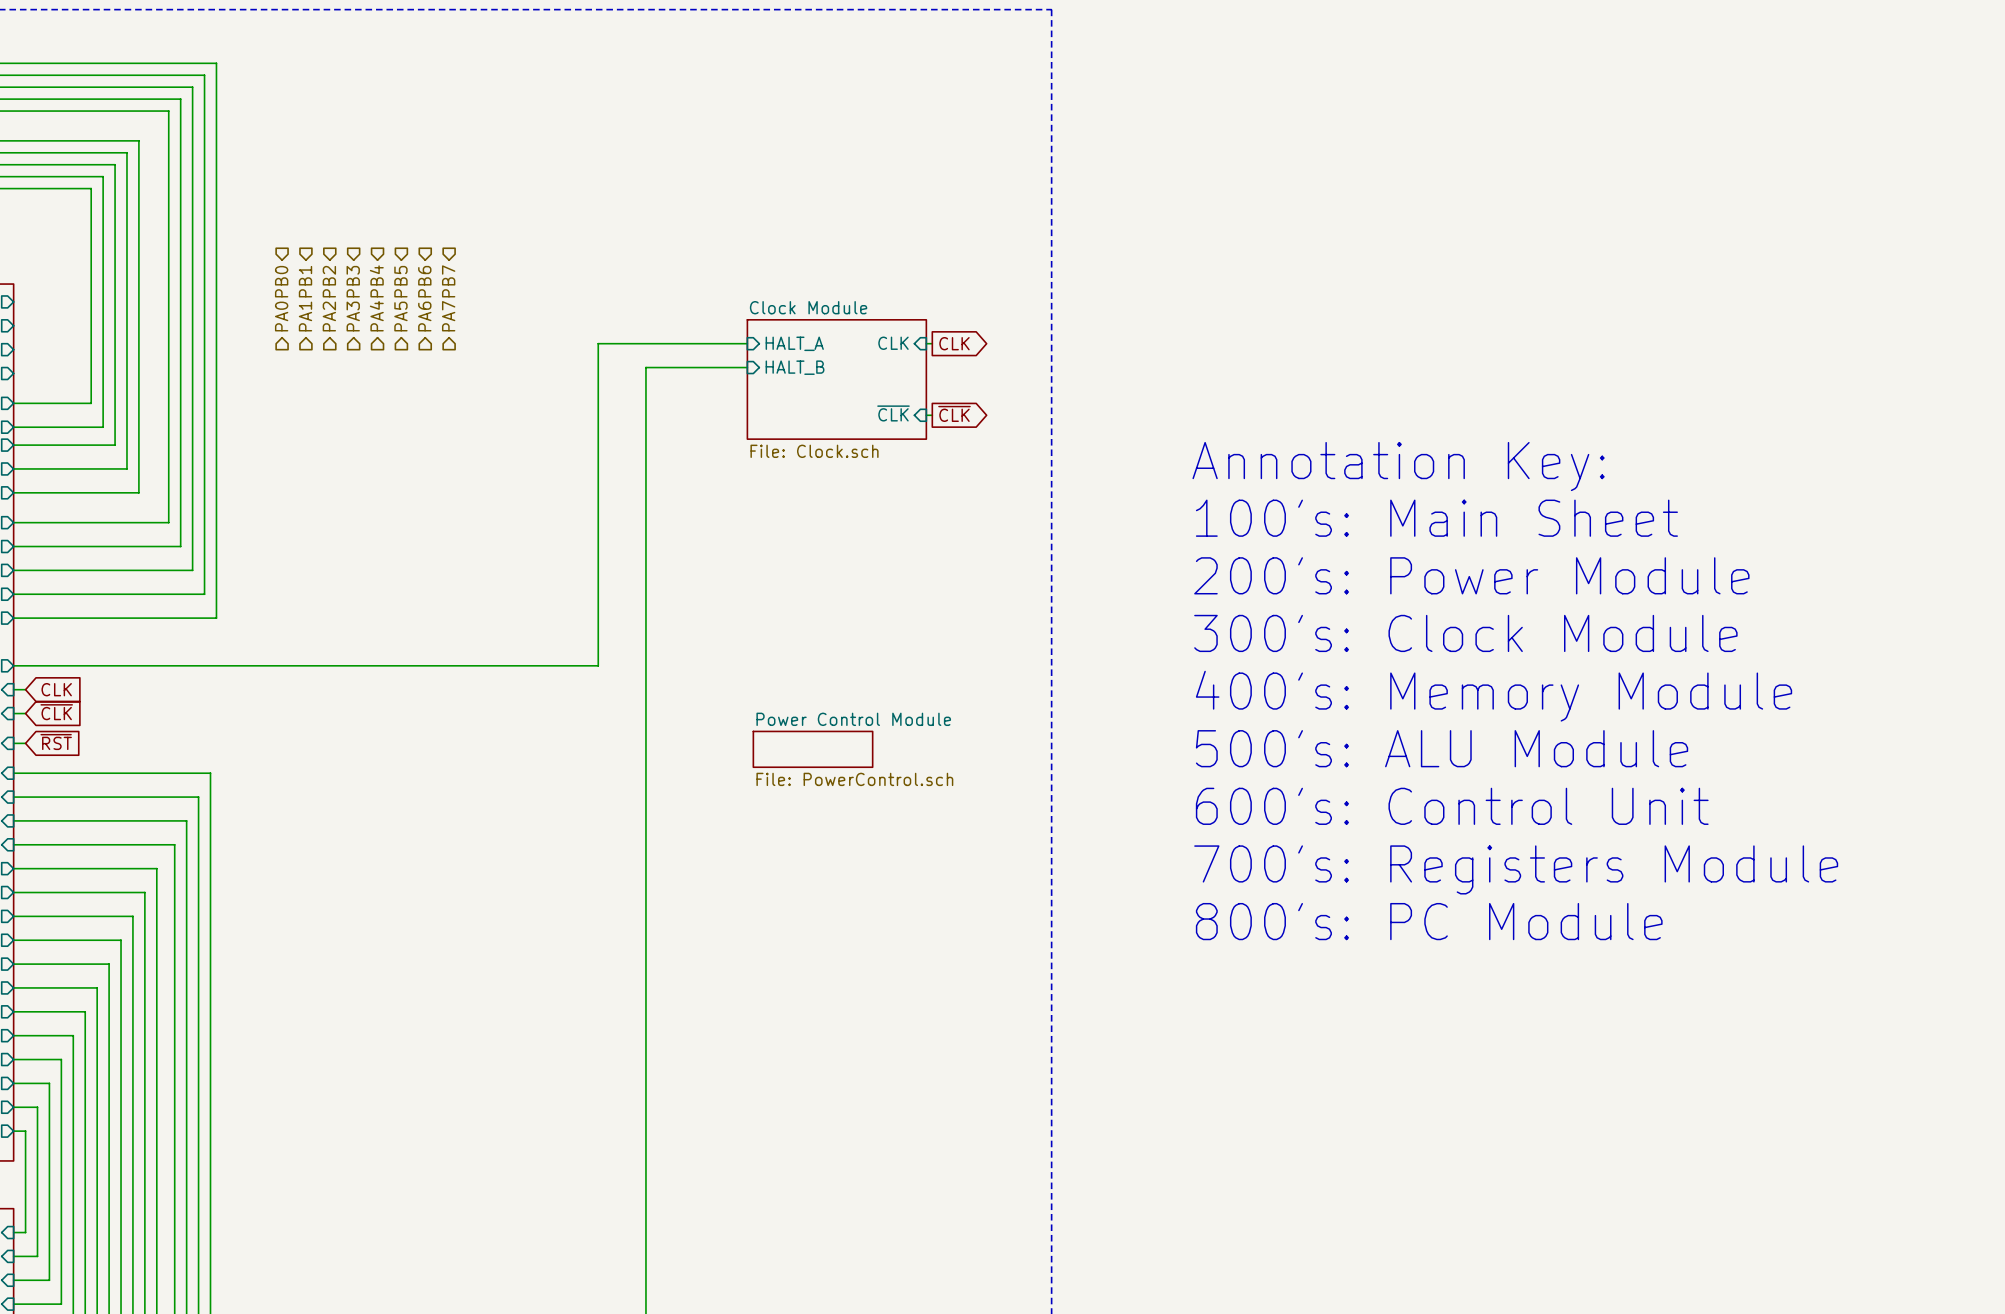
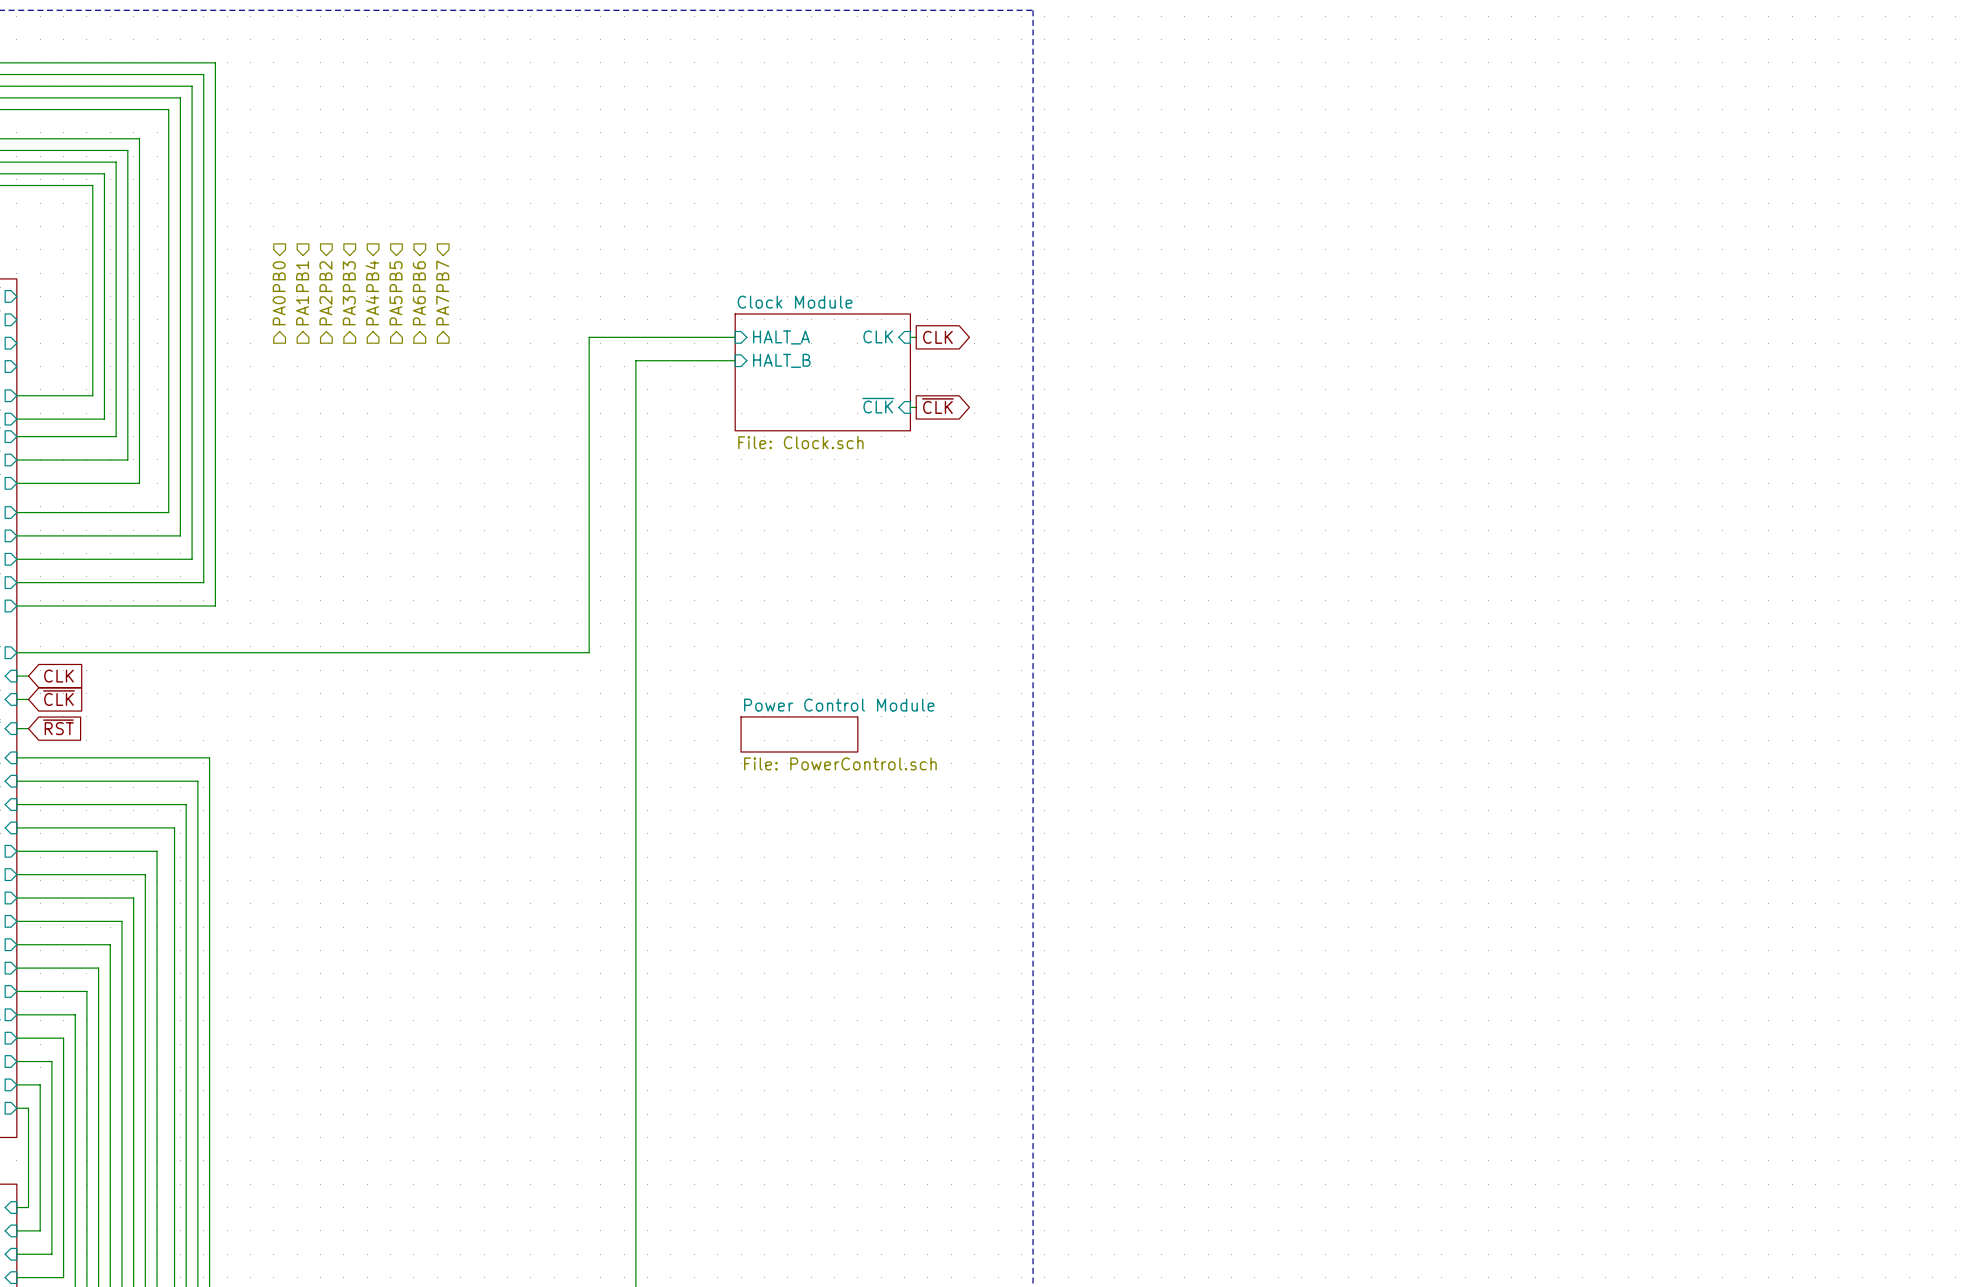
text: Annotation Key: (1398, 466) -> none
text: 100's: Main Sheet (1436, 518) -> none
text: 200's: Power Module (1471, 575) -> none
text: 300's: Clock Module (1465, 633) -> none
text: 400's: Memory Module (1494, 696) -> none
text: 500's: ALU Module (1442, 748) -> none
text: 600's: Control Unit (1452, 806) -> none
text: 700's: Registers Module (1516, 869) -> none
text: 800's: PC Module (1429, 921) -> none

